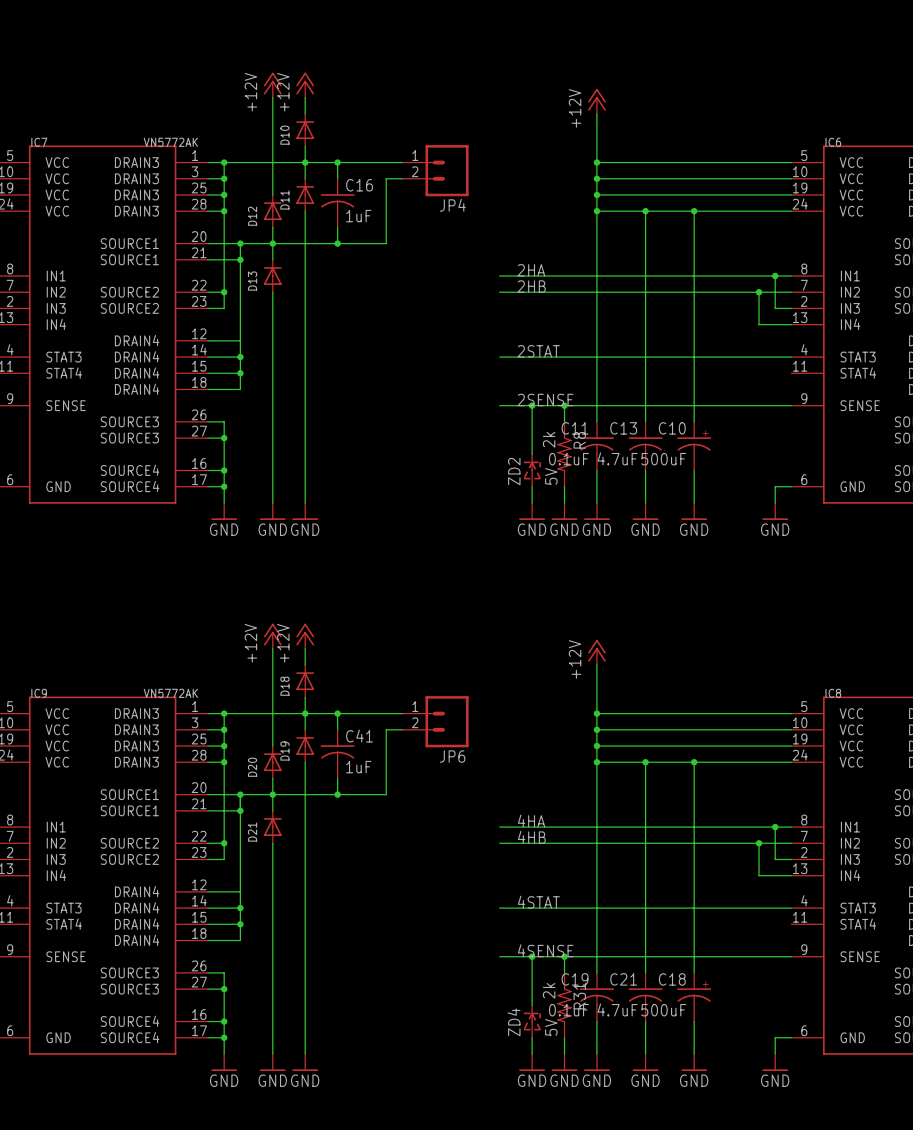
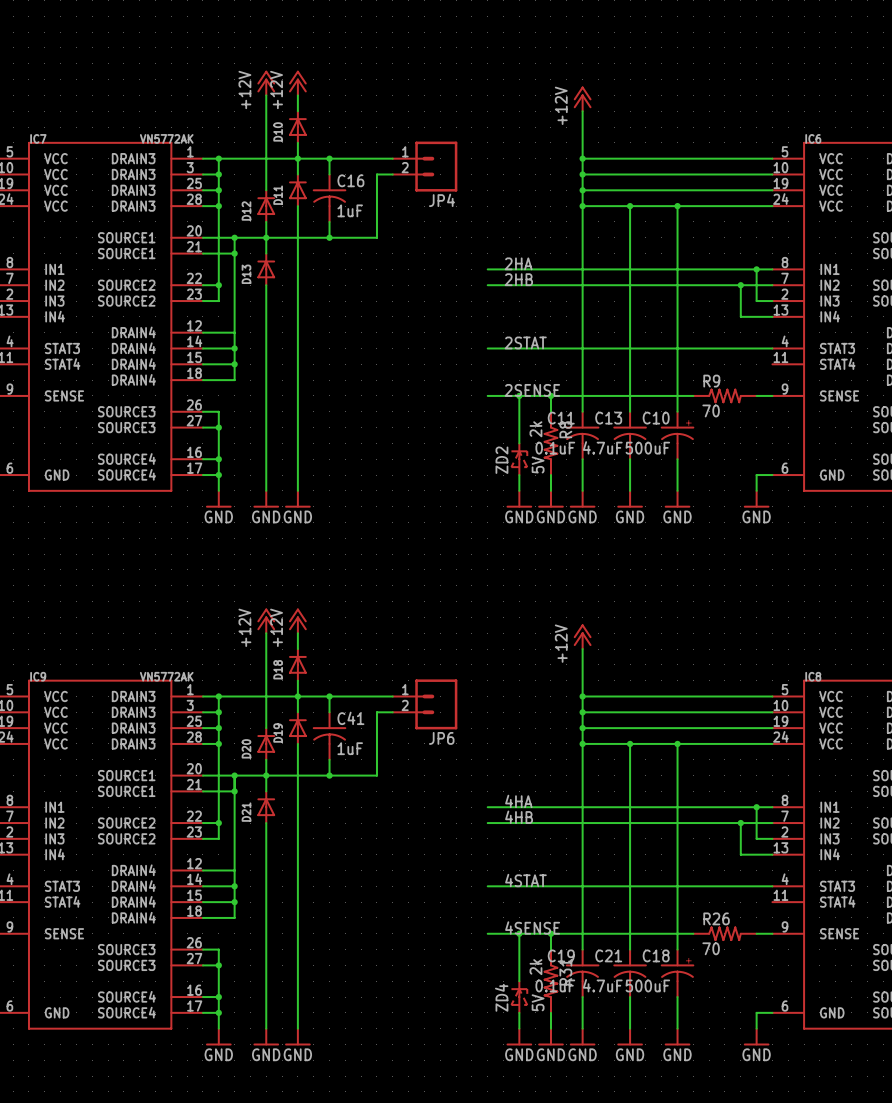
R9: none -> 70 (724, 395)
R26: none -> 70 (724, 933)

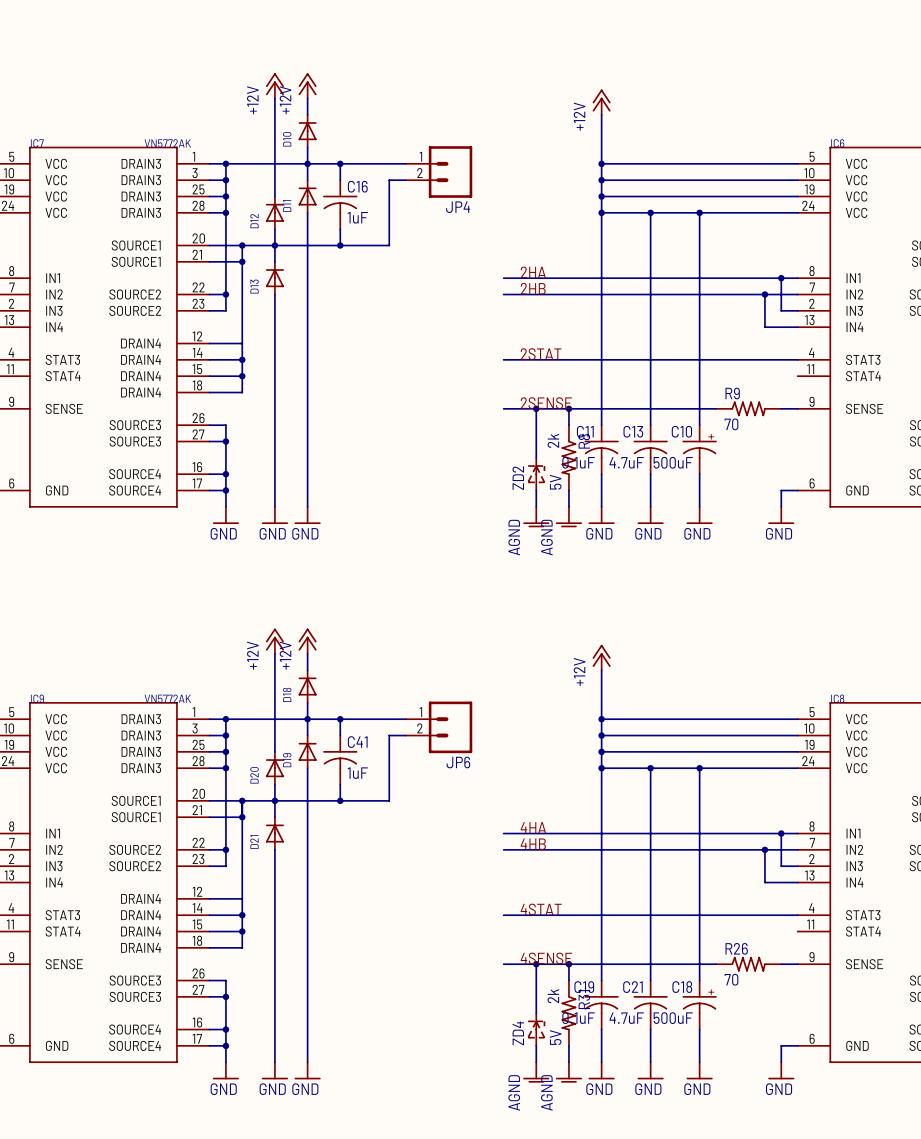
power symbol: GND (519, 499) -> AGND (536, 517)
power symbol: GND (550, 499) -> AGND (568, 517)
power symbol: GND (519, 1036) -> AGND (536, 1072)
power symbol: GND (550, 1036) -> AGND (568, 1072)

